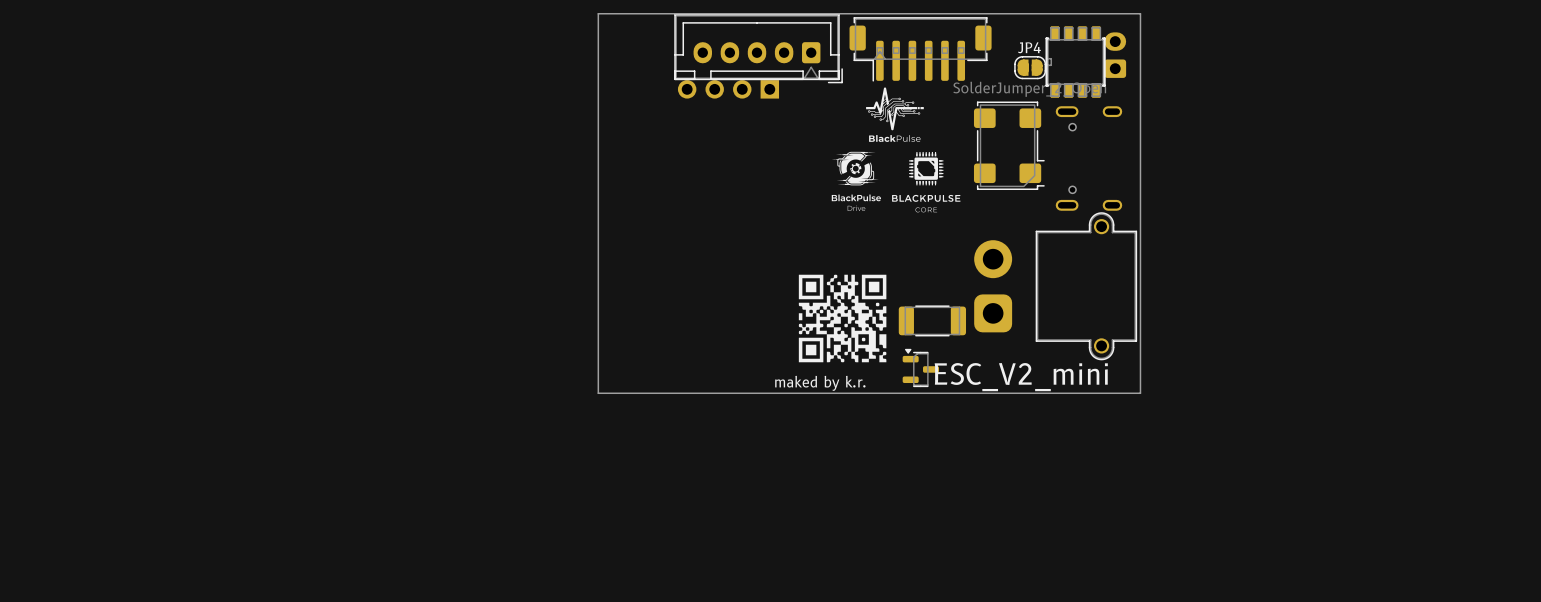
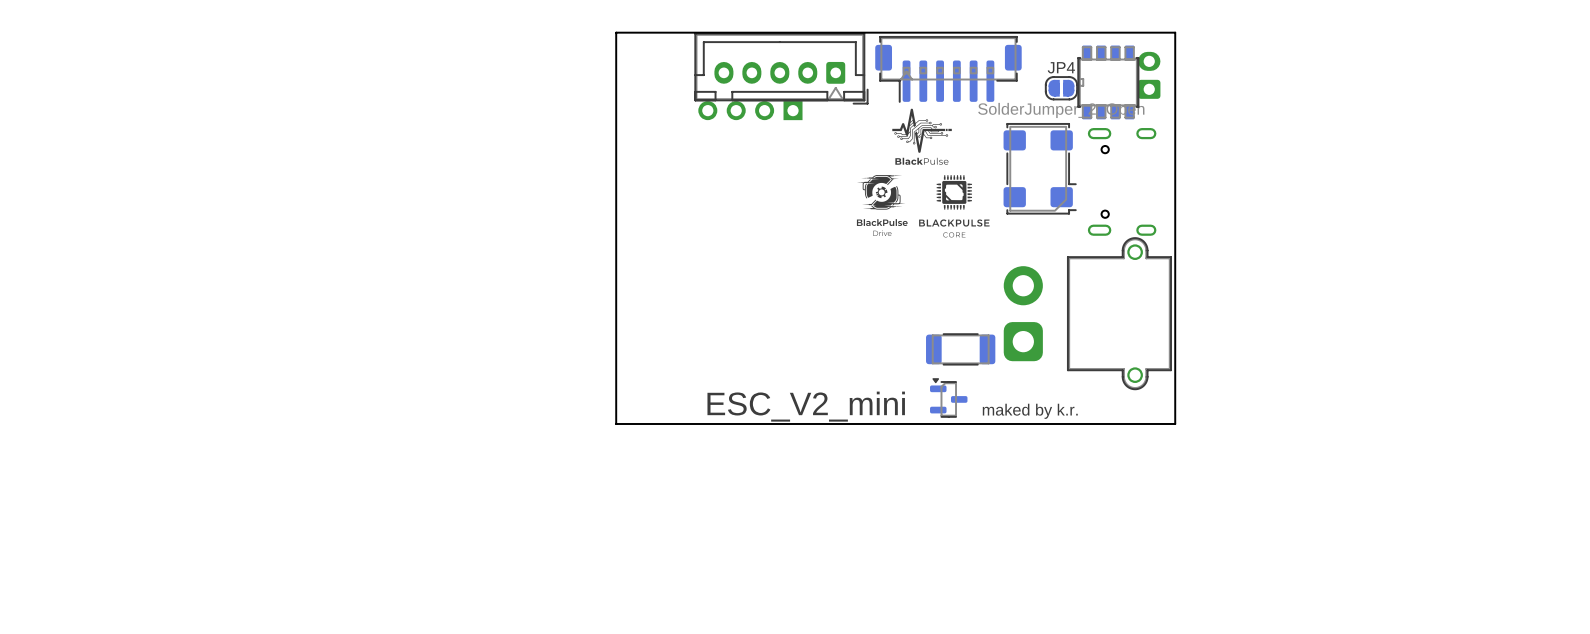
drawing: [798, 274, 887, 363] -> none
text position: ESC_V2_mini (1021, 377) -> ESC_V2_mini (806, 406)
text position: maked by k.r. (820, 383) -> maked by k.r. (1030, 411)

